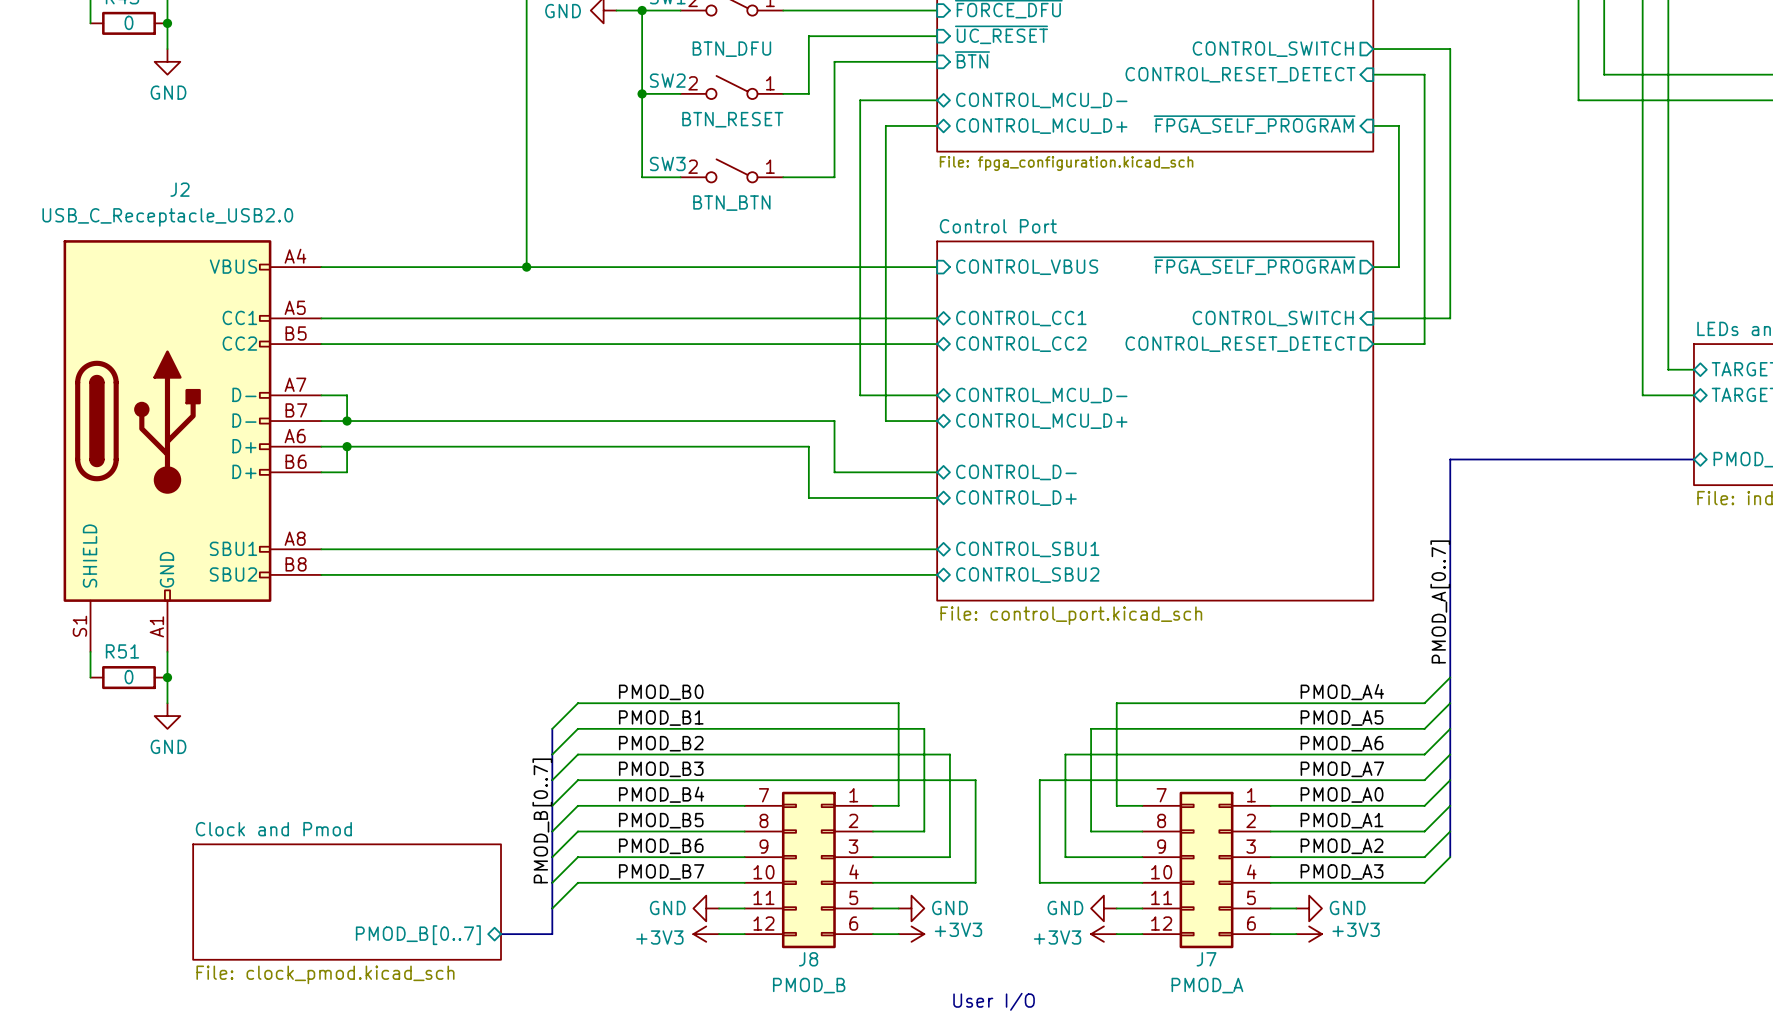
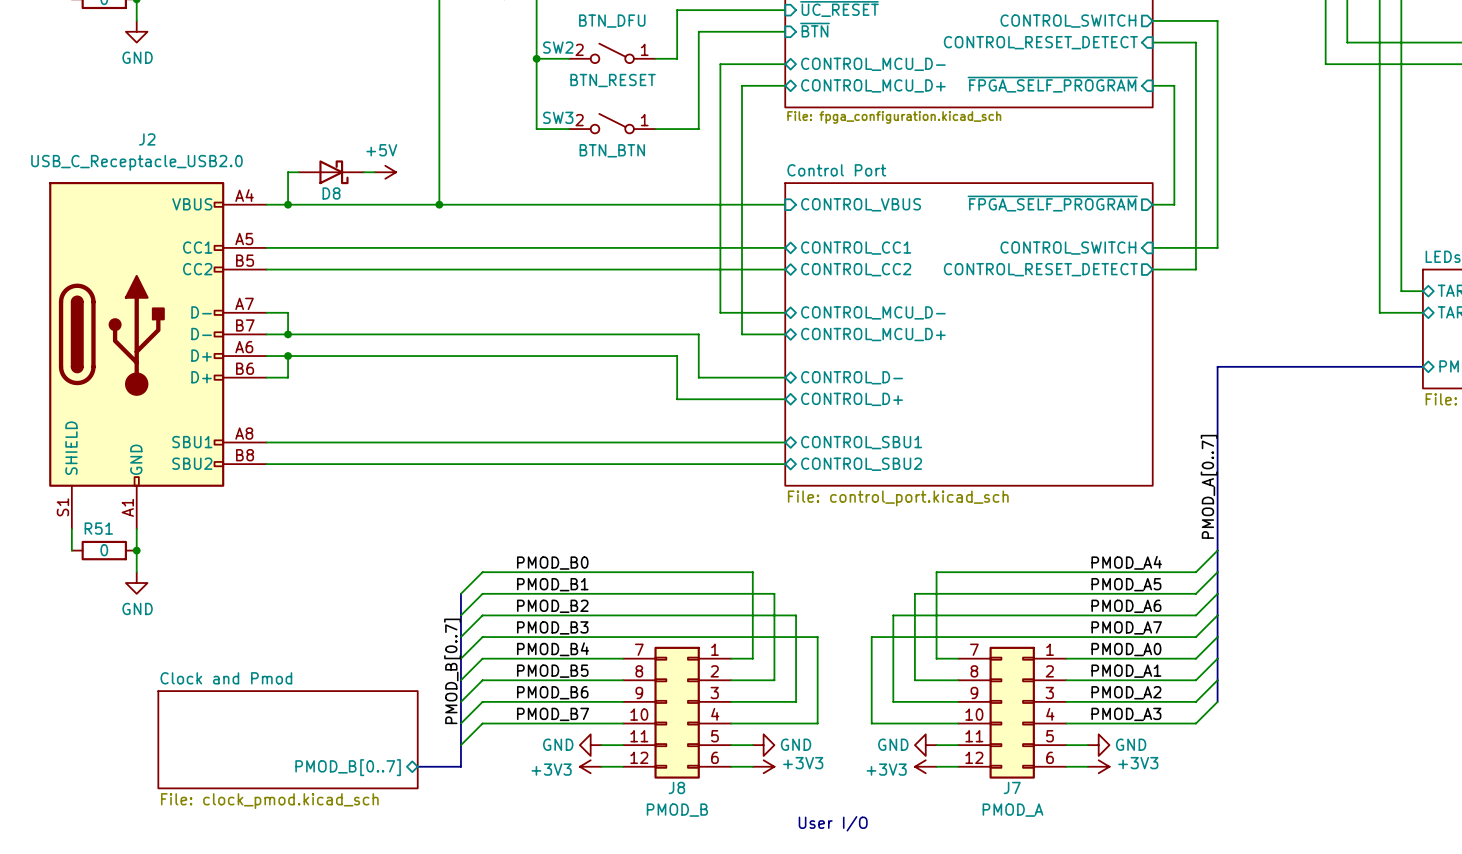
wire: none -> (298, 172) (288, 172) (288, 204)
D8: none -> (331, 172)
wire: none -> (363, 172) (374, 172)
power symbol: none -> +5V (385, 172)
junction: none -> (288, 204)

